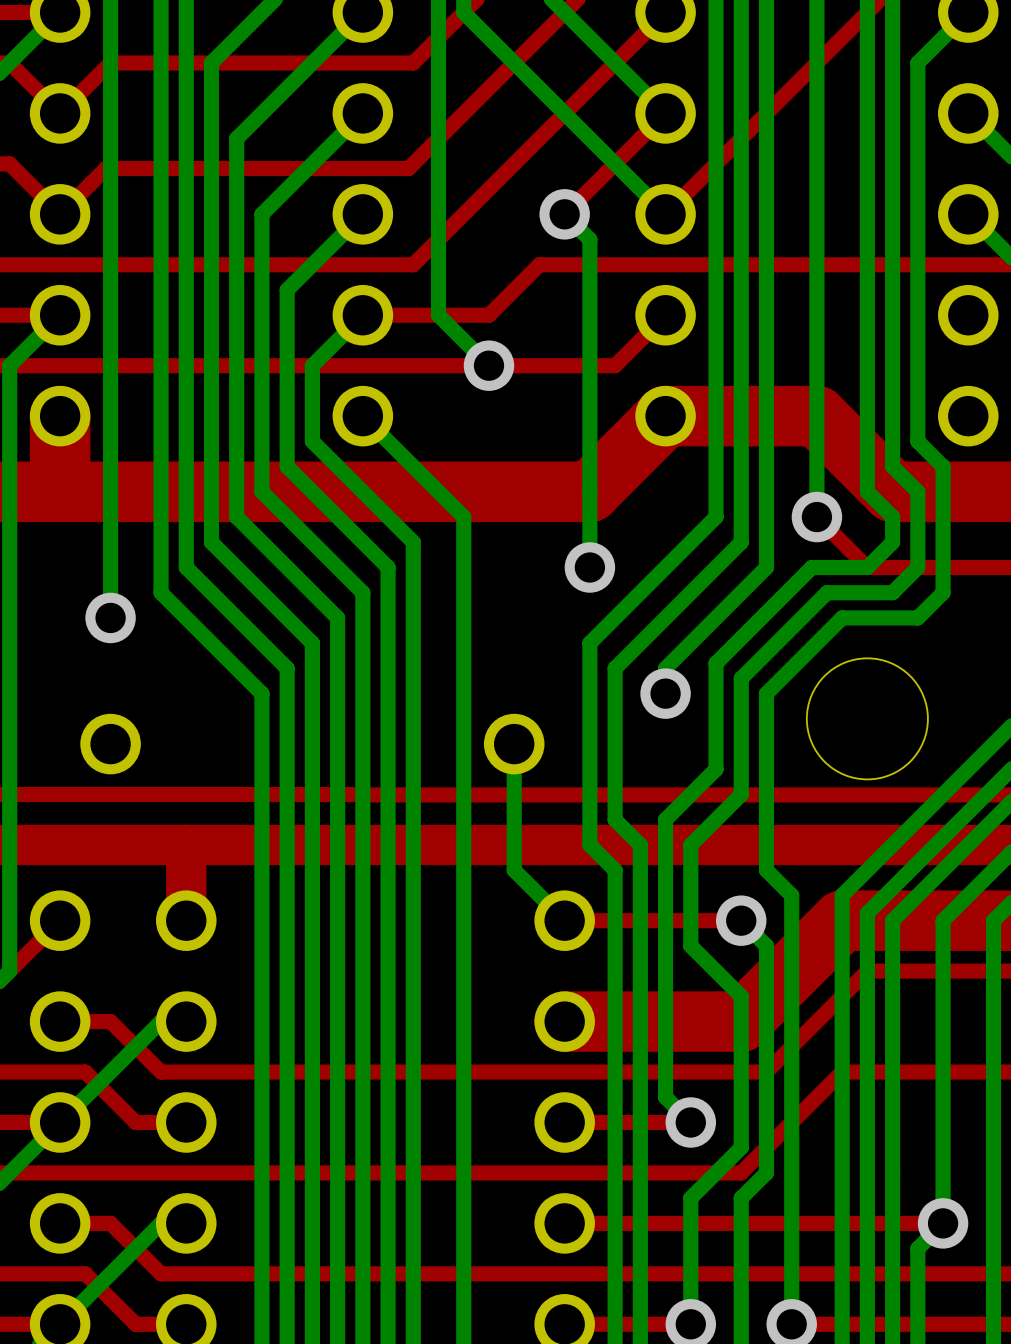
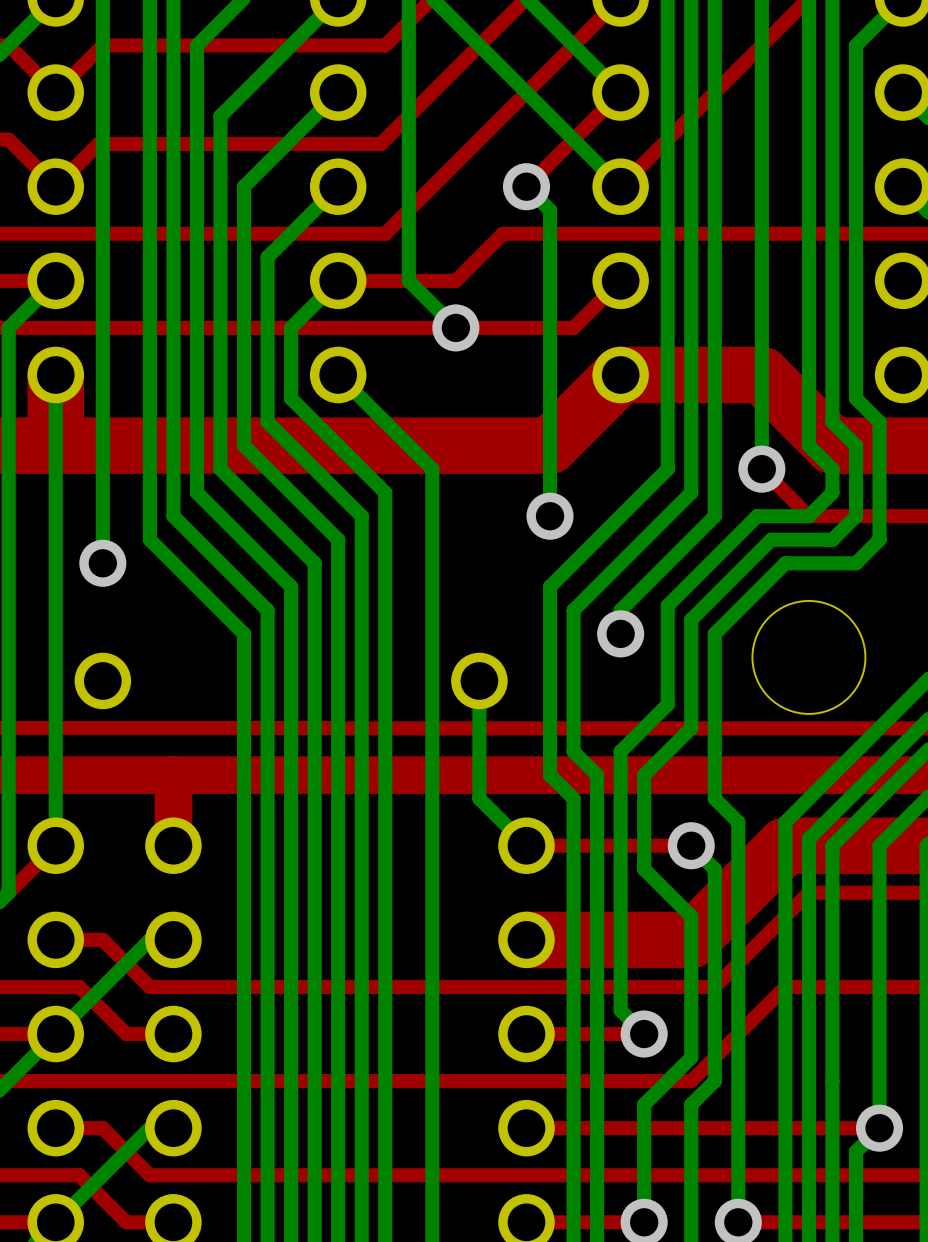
bottom track: none -> (55, 374) (55, 845)

